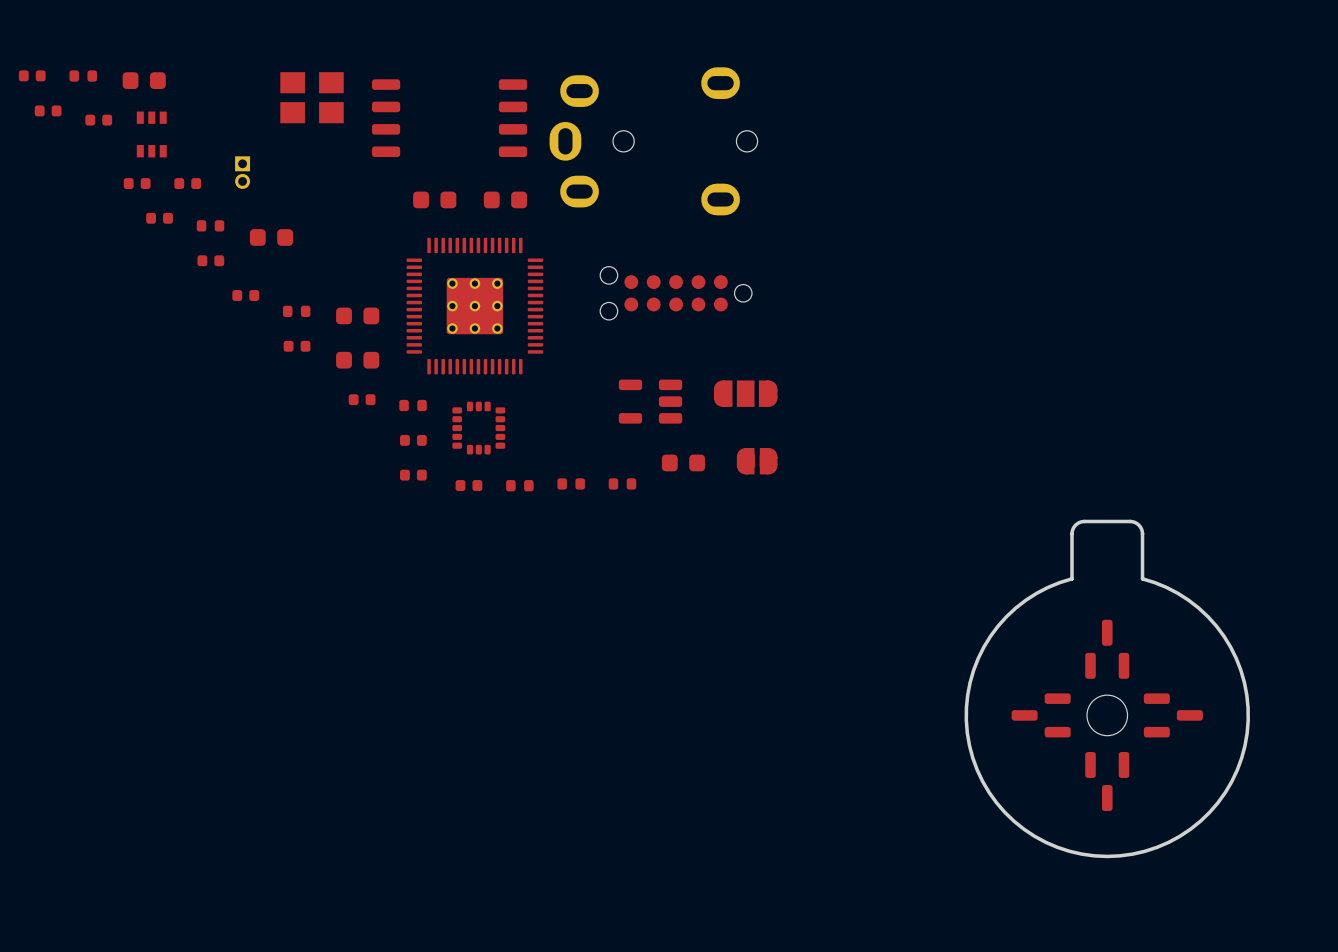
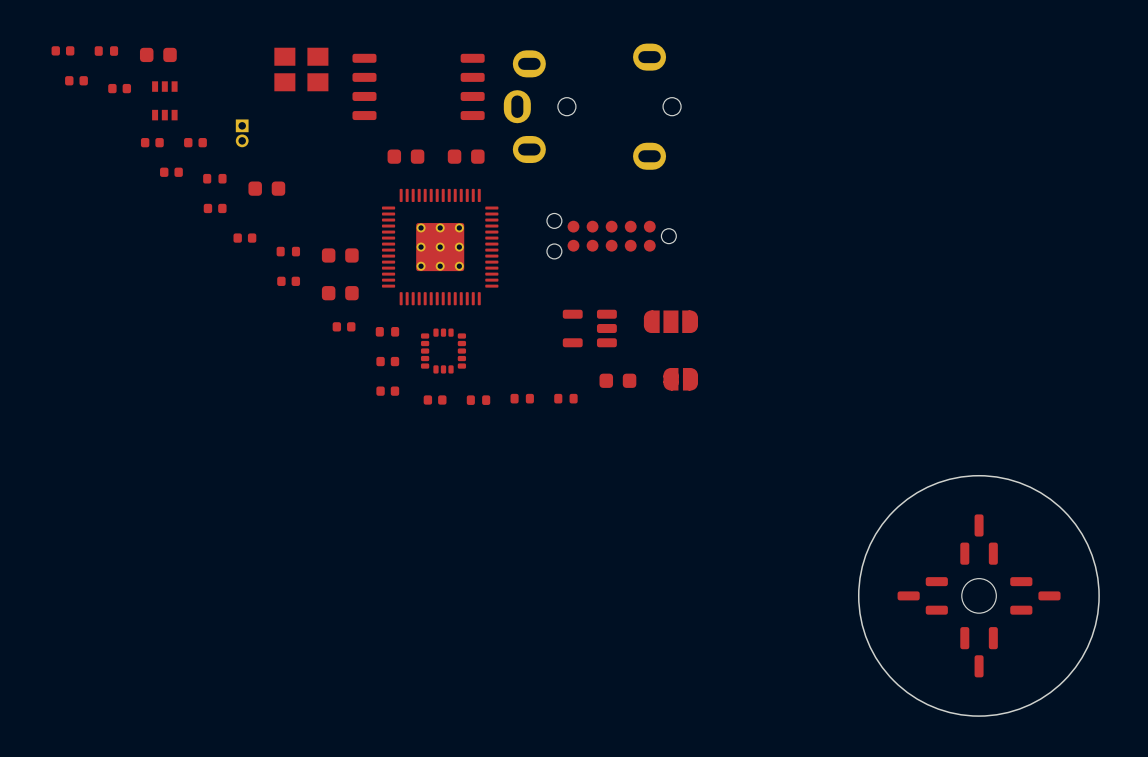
board edge: (1130, 521) (1082, 521) (1075, 525) (1072, 532) (1072, 578) (1036, 593) (1006, 616) (990, 636) (978, 658) (967, 695) (966, 720) (969, 745) (977, 769) (996, 802) (1023, 829) (1045, 842) (1069, 851) (1094, 855) (1119, 855) (1144, 851) (1168, 842) (1190, 829) (1209, 812) (1225, 792) (1241, 758) (1247, 733) (1248, 707) (1244, 682) (1230, 647) (1216, 626) (1198, 607) (1177, 593) (1142, 578) (1142, 530) (1137, 524) (1130, 521) -> none
round board edge: none -> [857, 474, 1100, 717]

